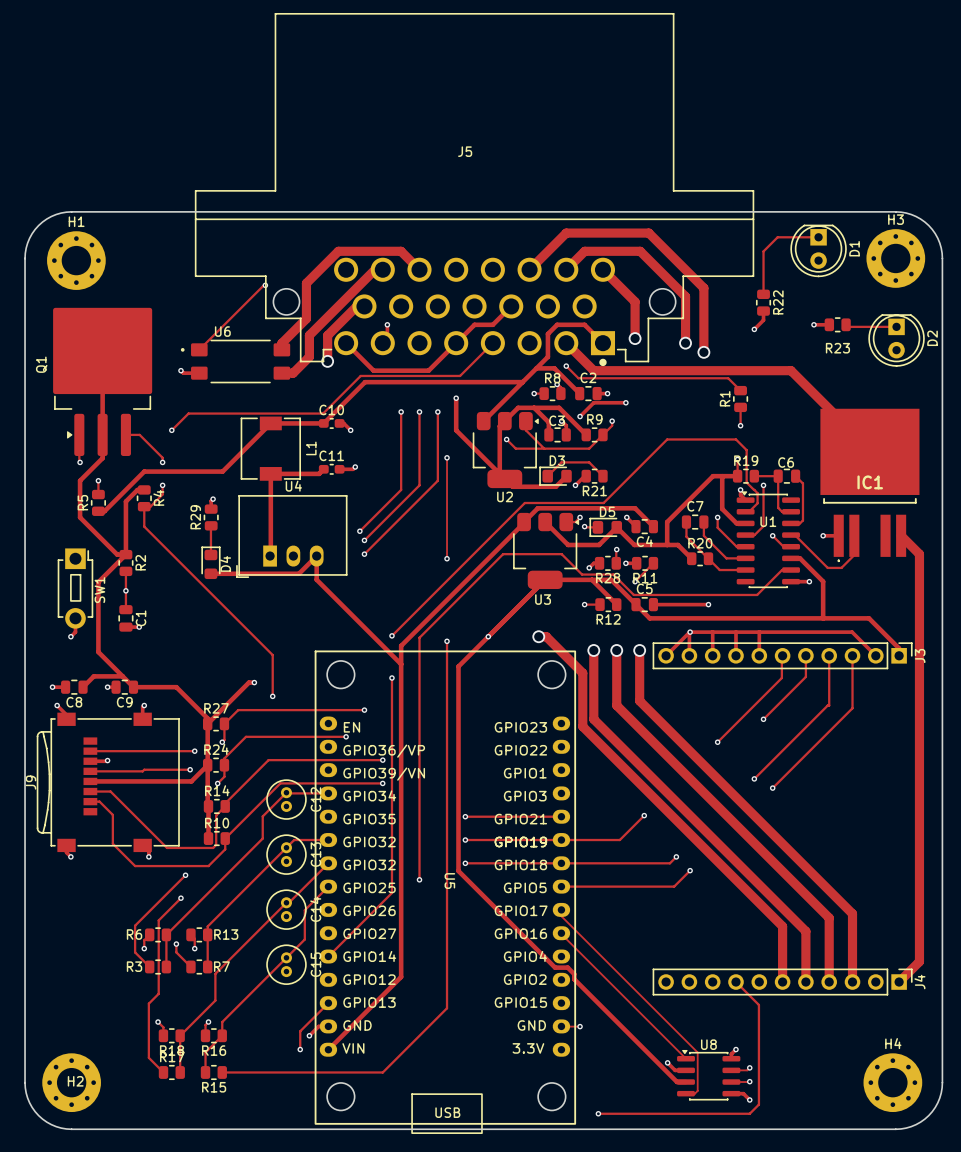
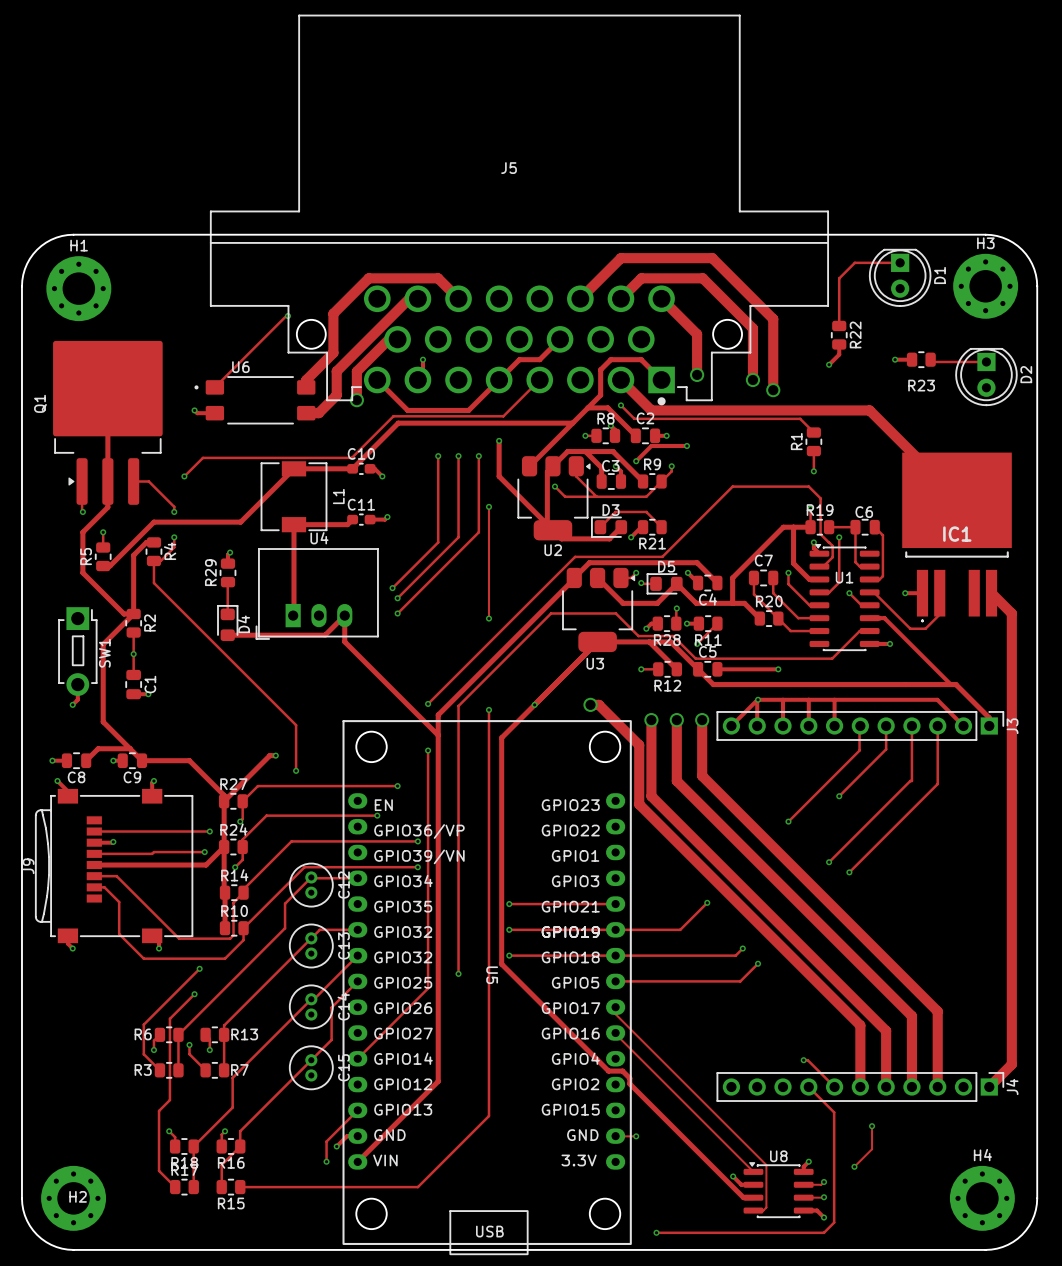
track: (799, 558) (823, 581) (823, 618) -> (879, 618) (884, 618) (950, 684)
track: none -> (803, 1060) (807, 1060) (834, 1087)
via: none -> (803, 1060)
track: none -> (872, 1126) (872, 1149) (854, 1166)
via: none -> (872, 1126)
via: none -> (854, 1166)

